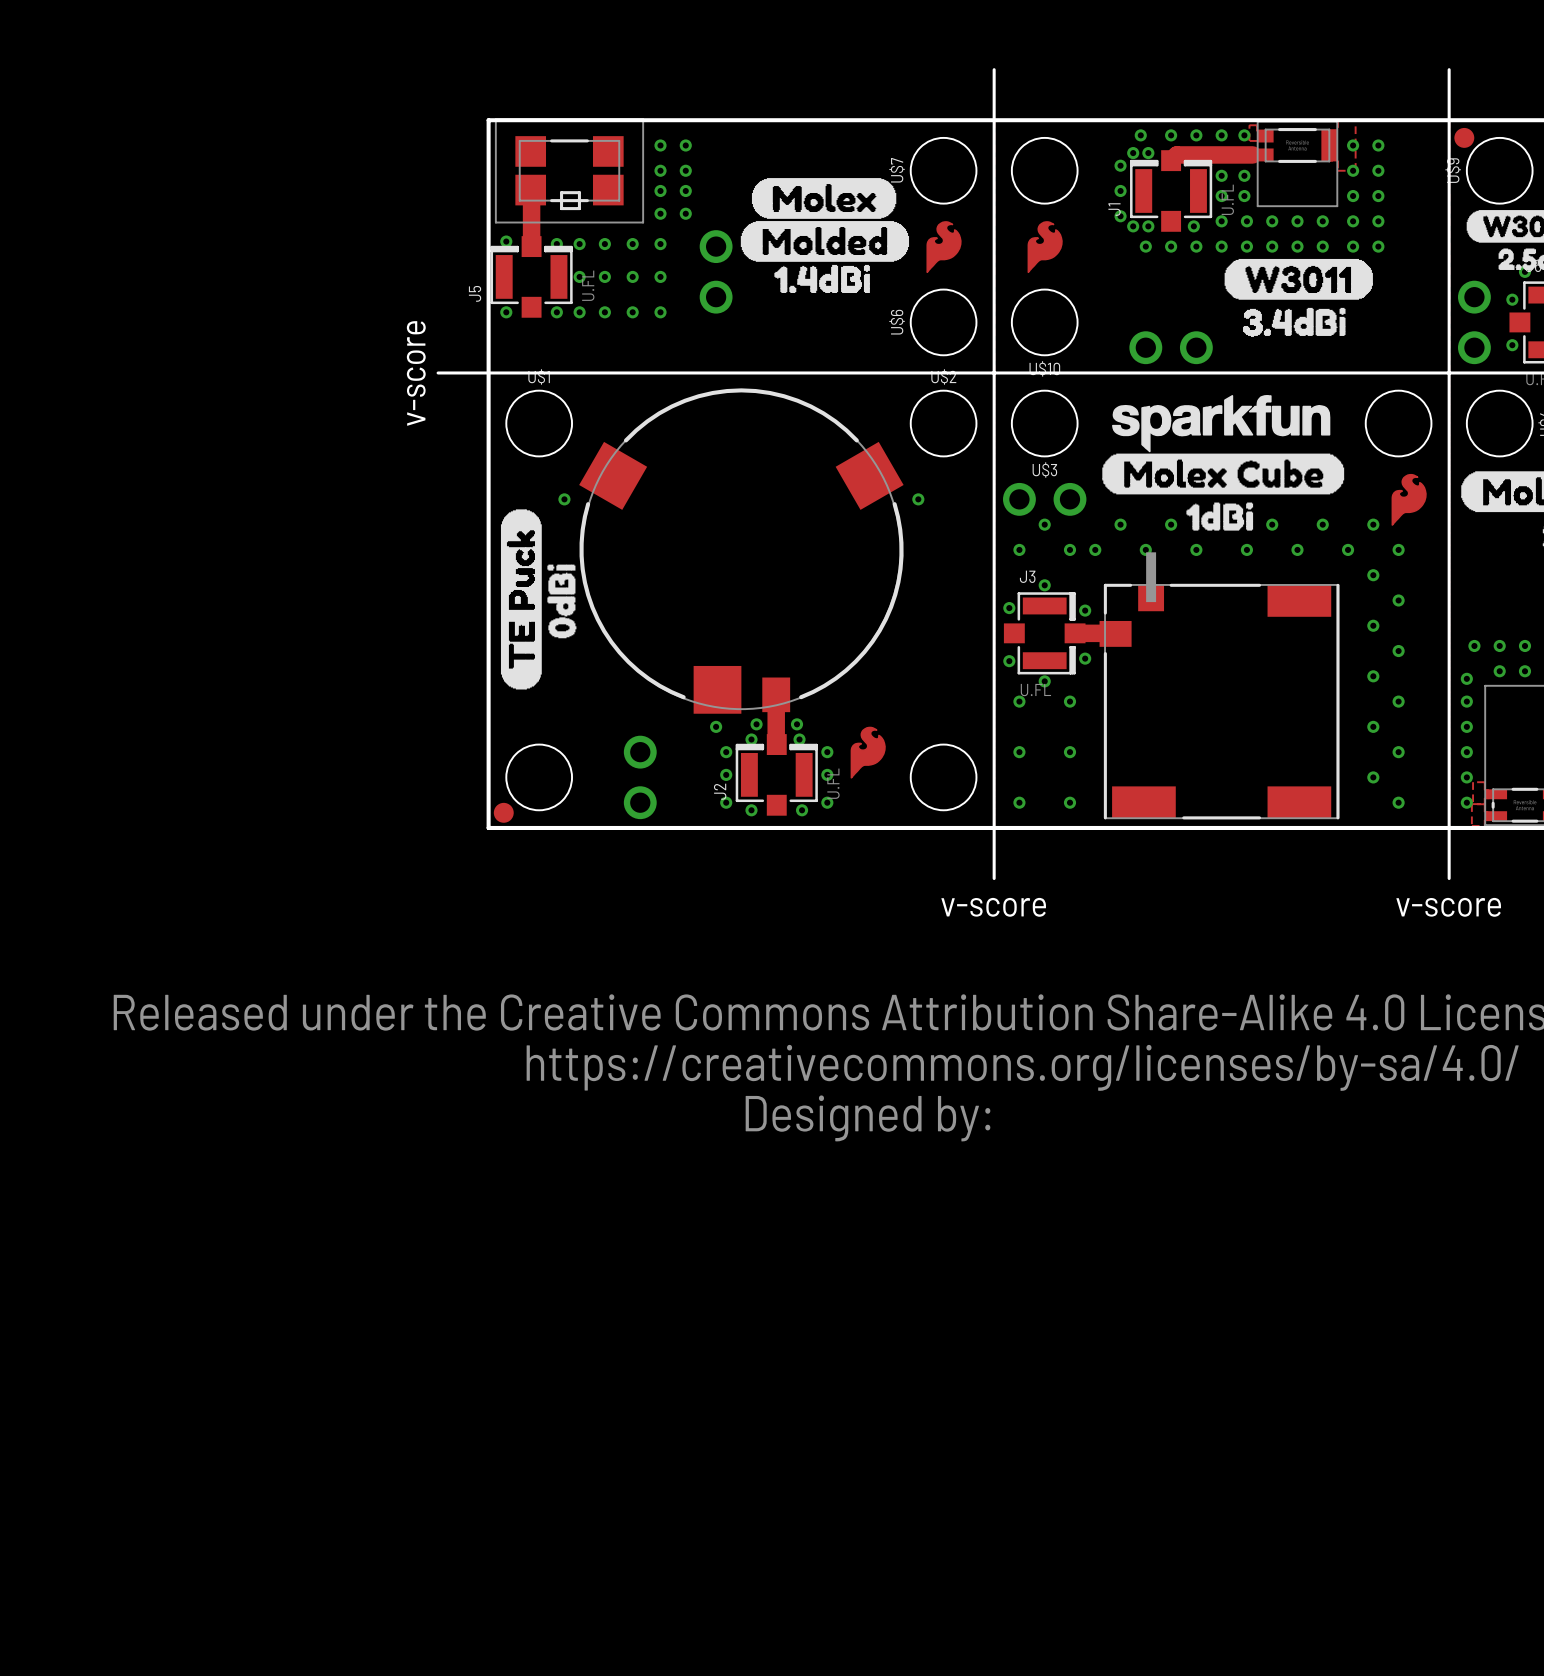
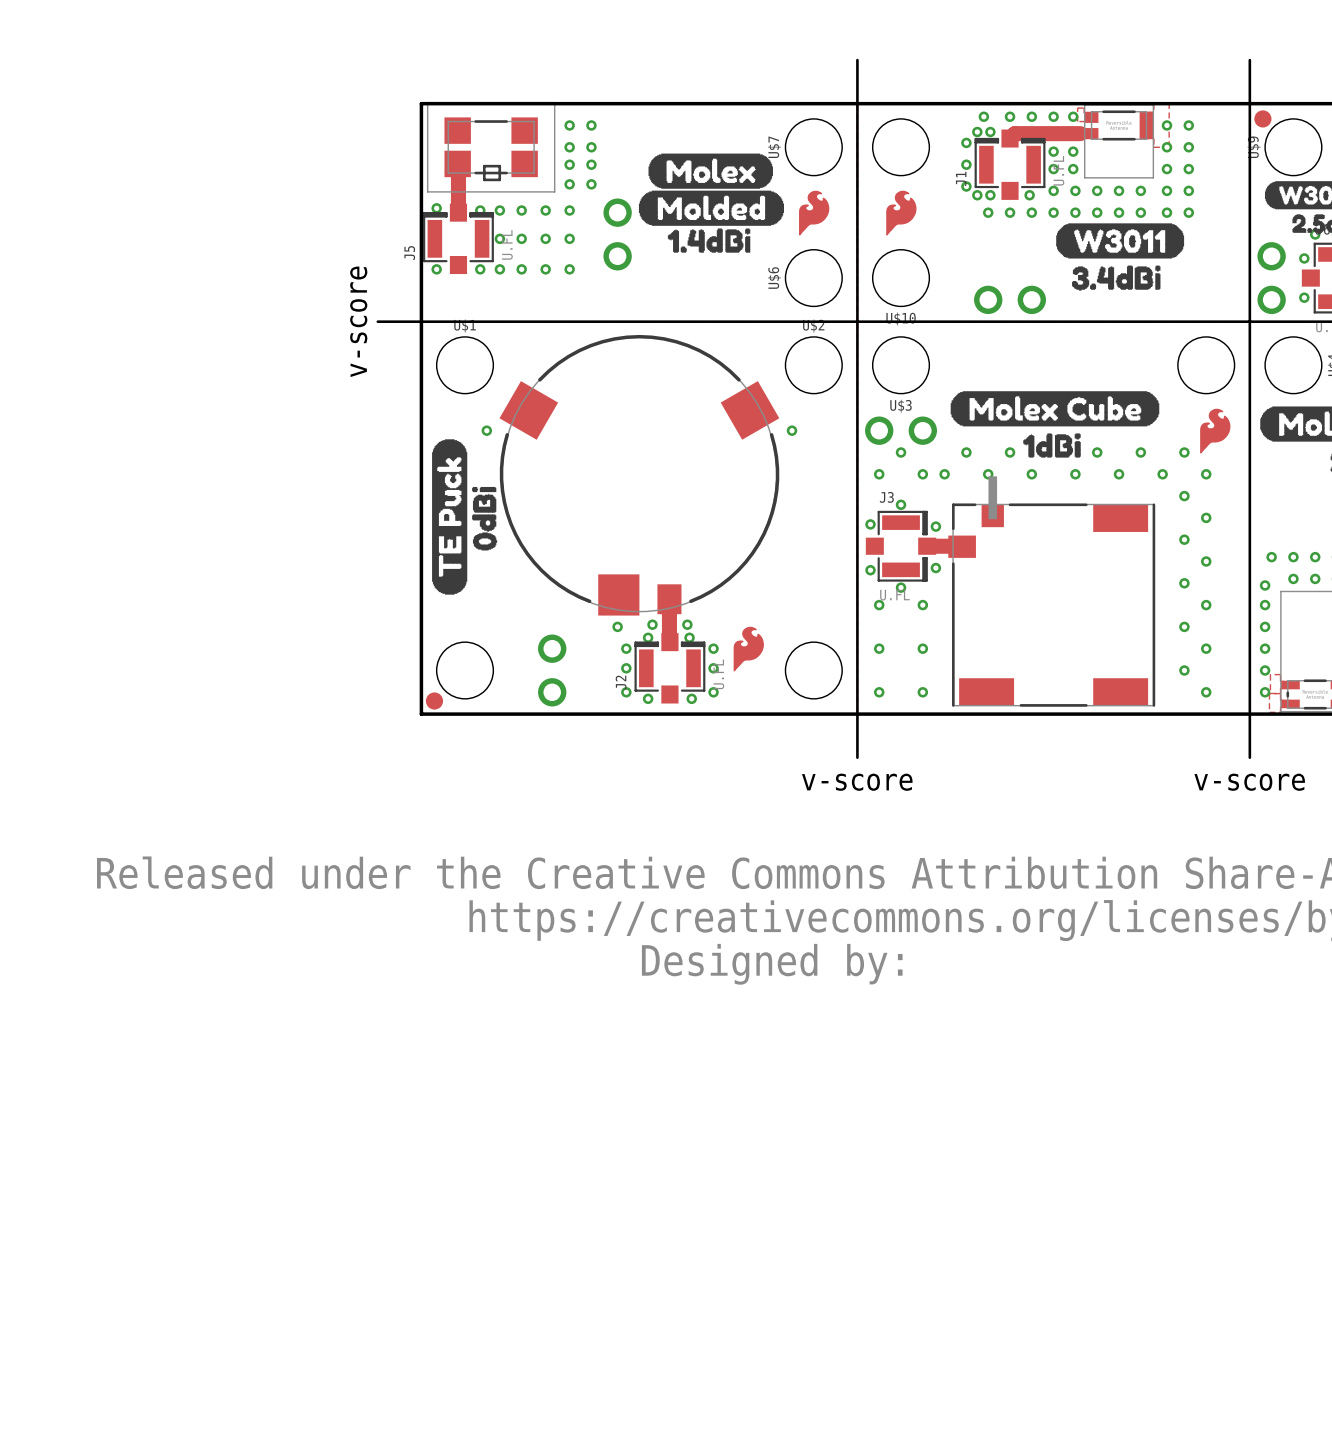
drawing: [1112, 395, 1331, 453] -> none

